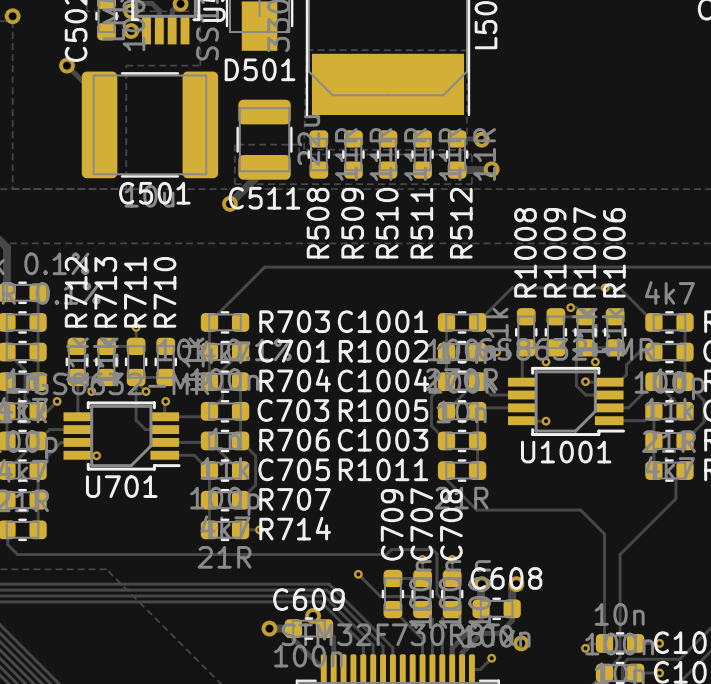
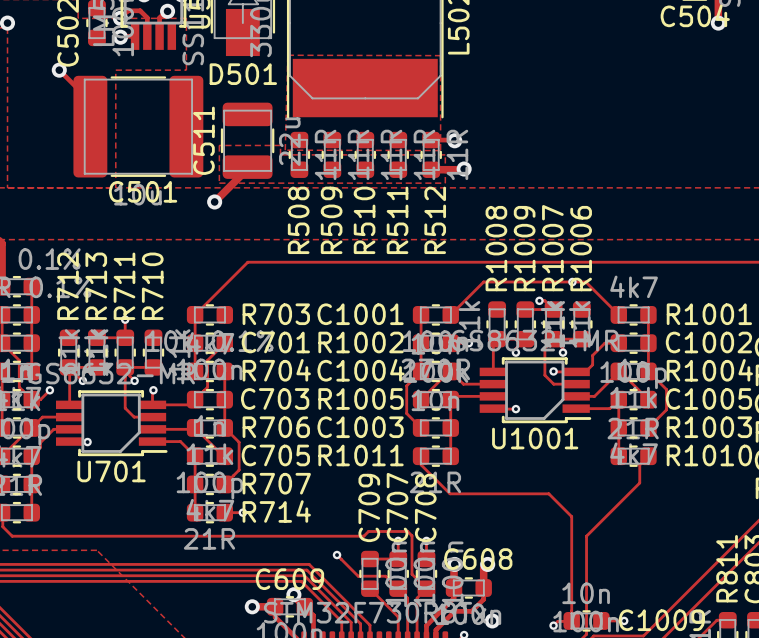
C511 name rotation: 0° (264, 198) -> 90° counterclockwise (203, 140)

